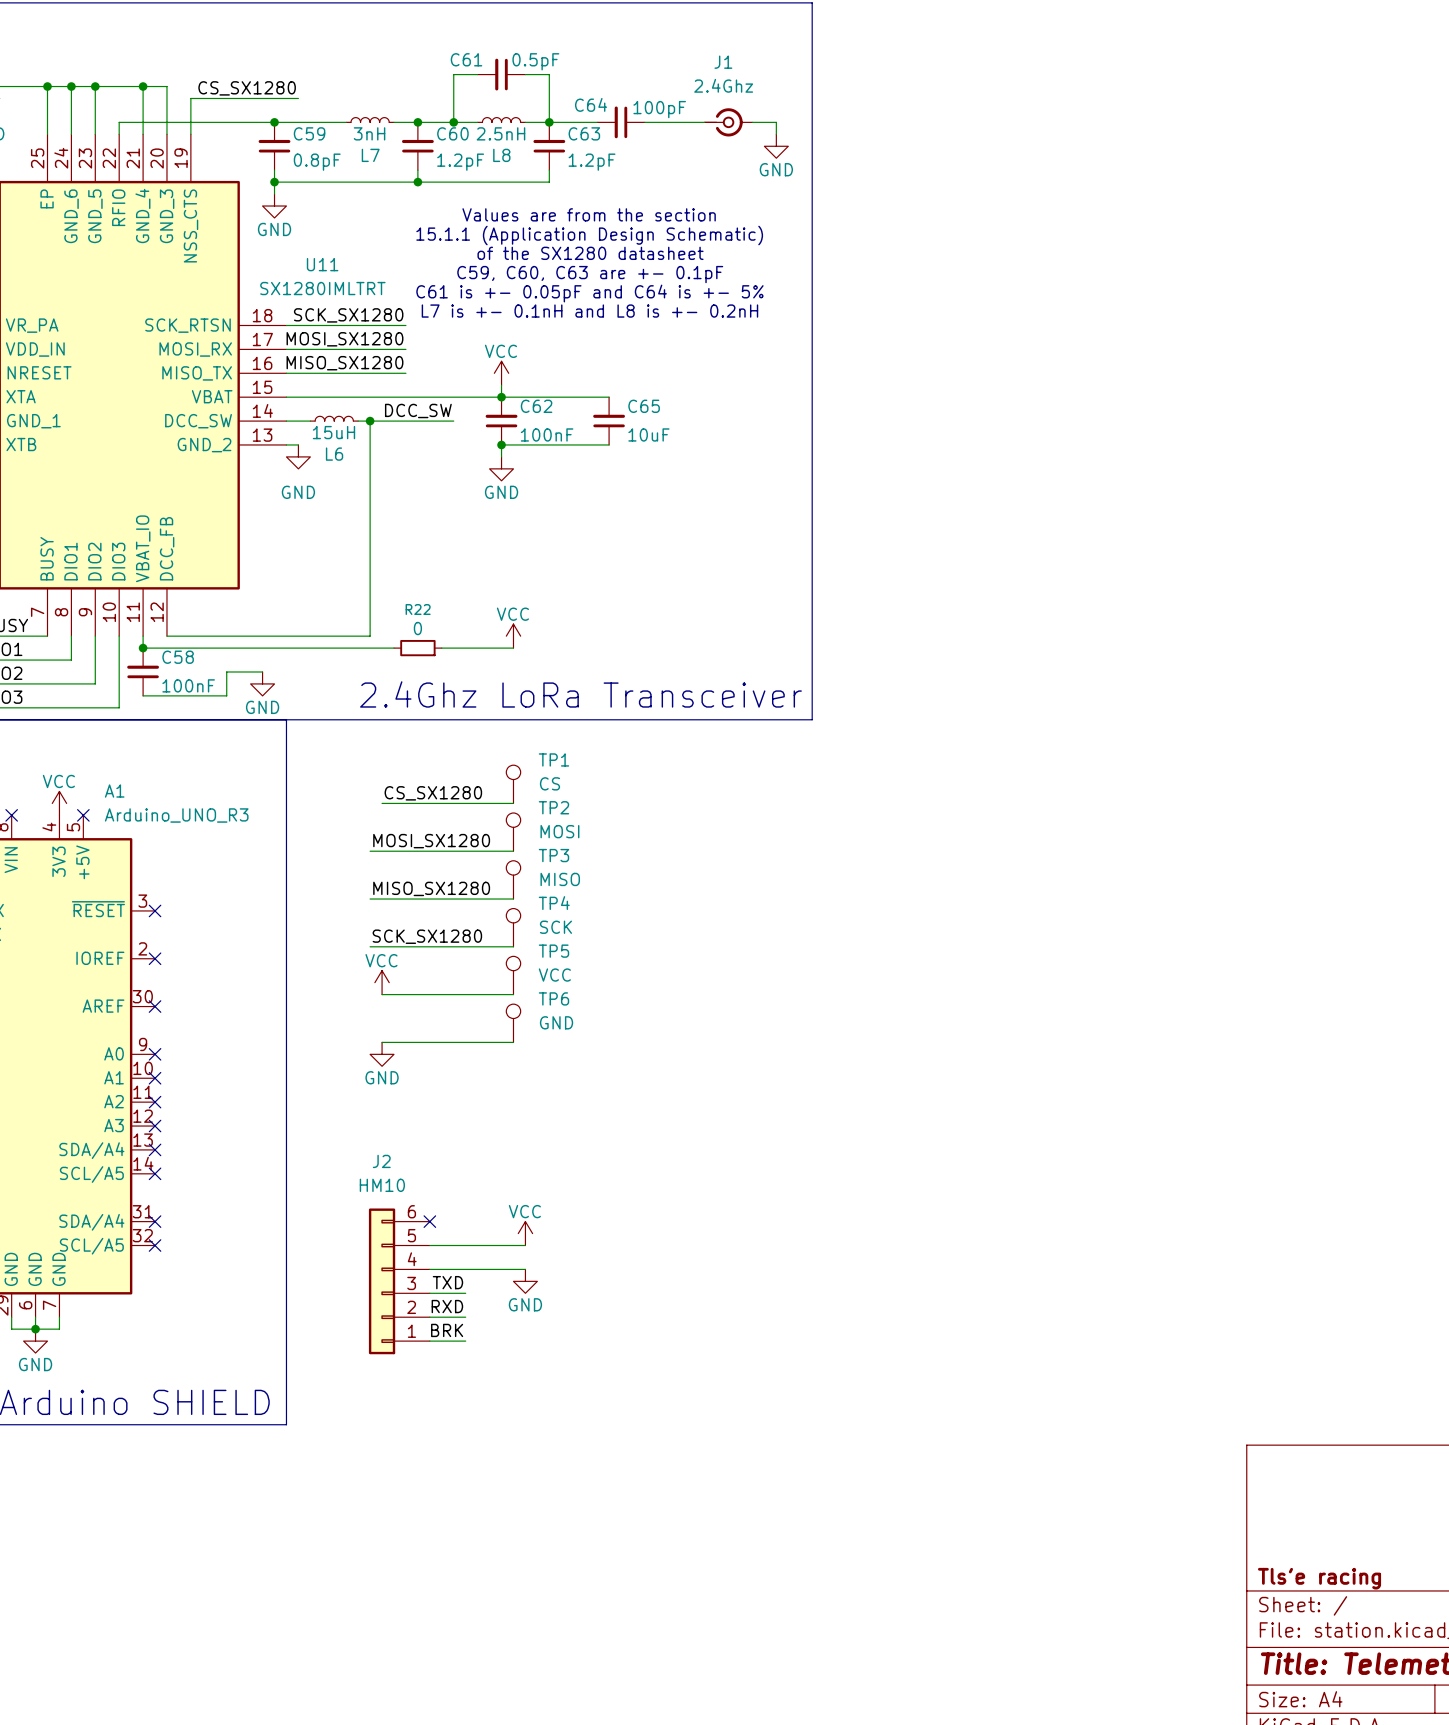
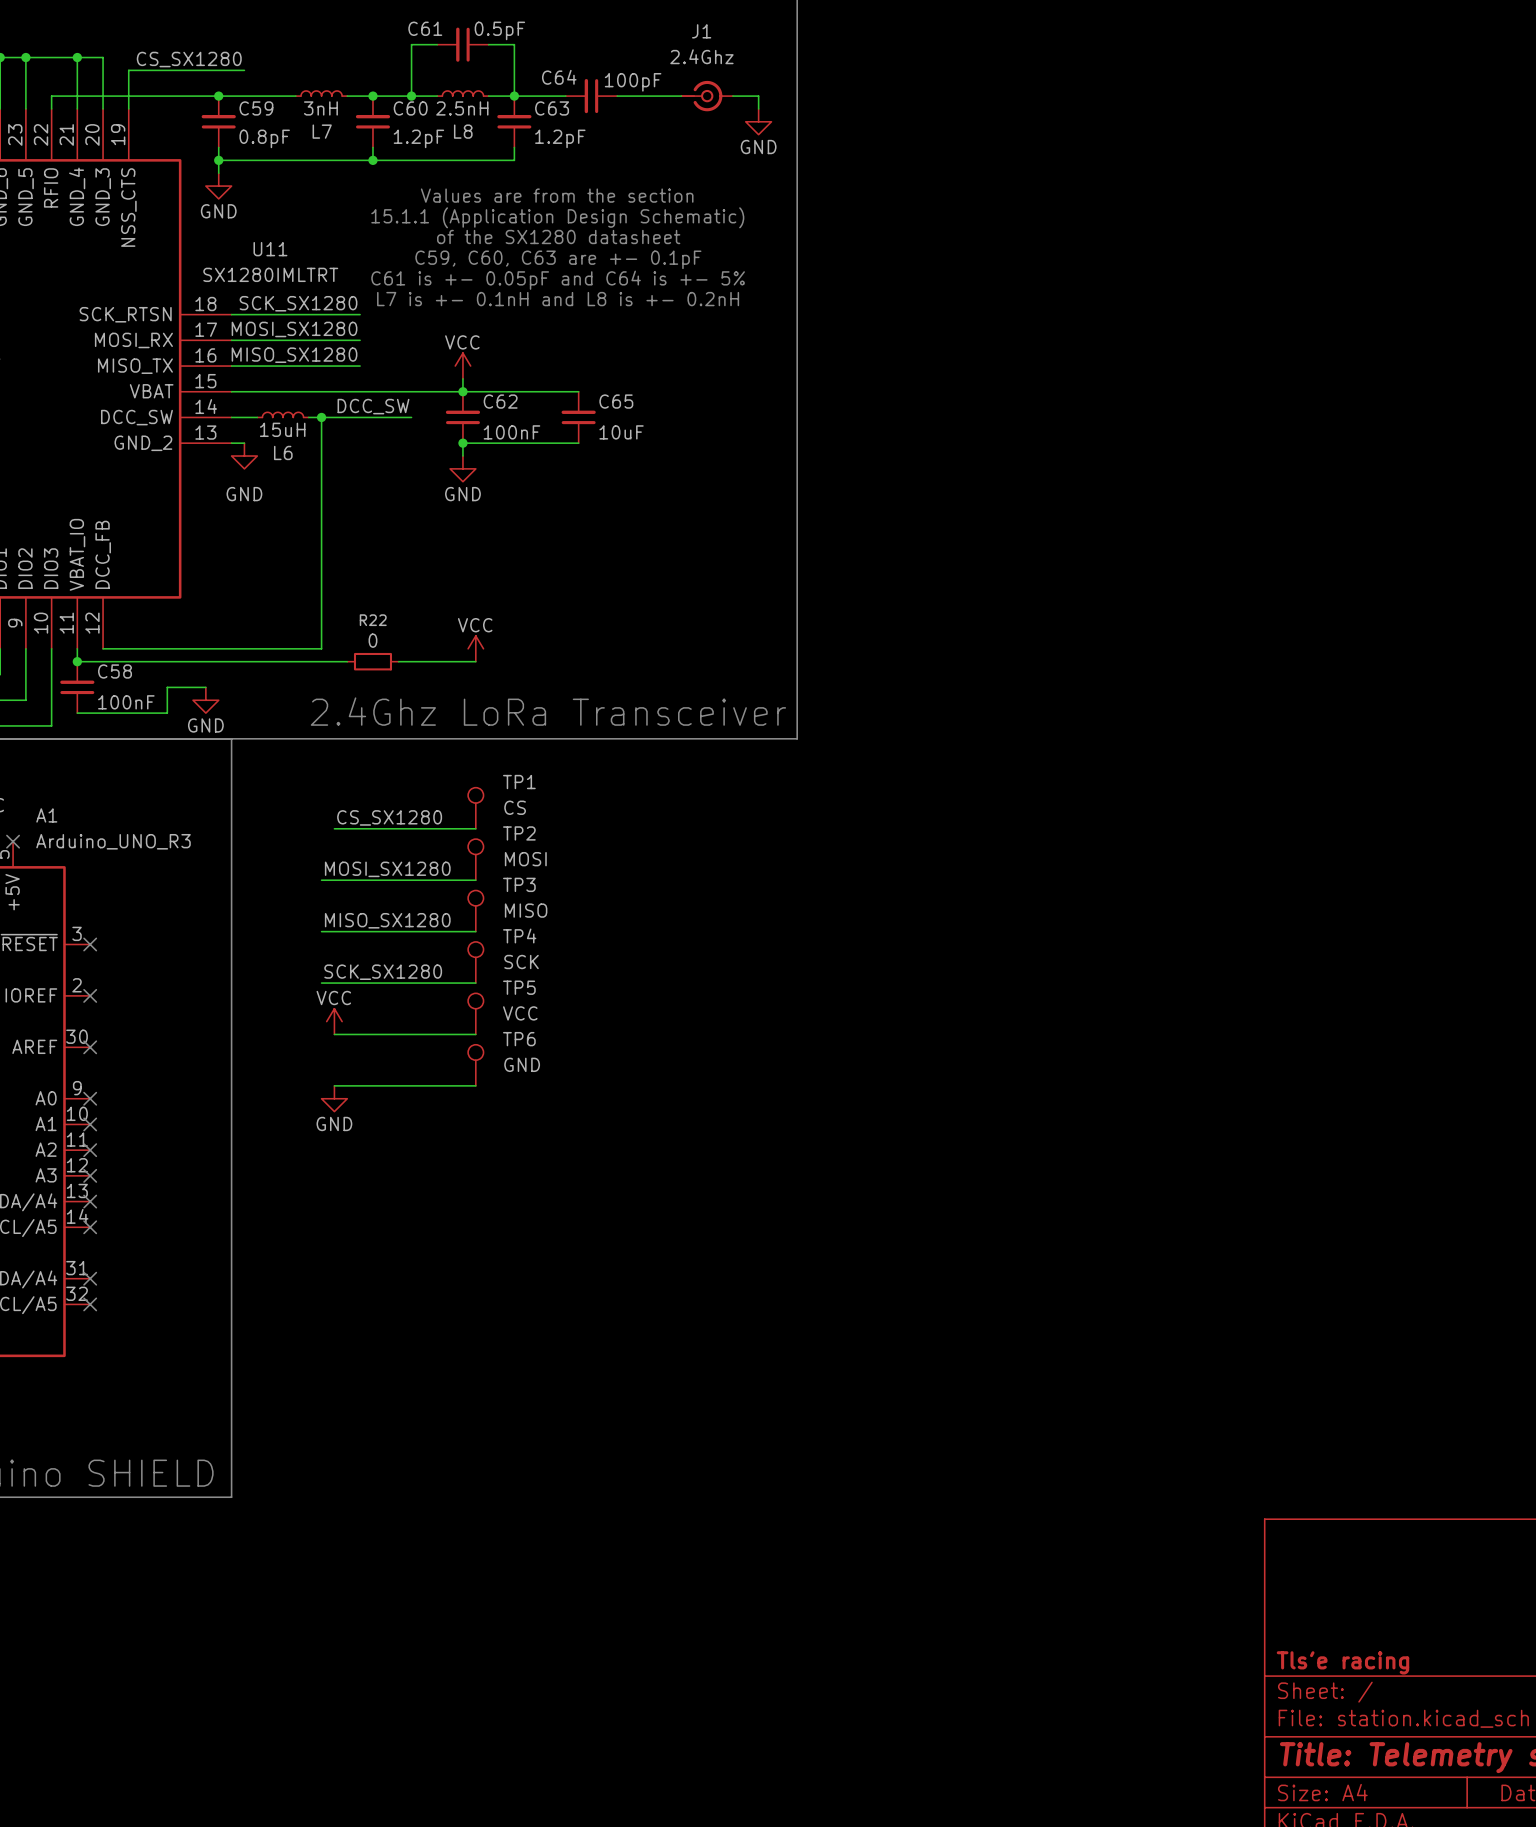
no-connect mark: (429, 1221) -> none
power symbol: VCC (525, 1233) -> none
wire: (429, 1245) (525, 1245) -> none
wire: (429, 1269) (525, 1269) -> none
J2: HM10 (399, 1281) -> none
power symbol: GND (525, 1281) -> none
label: TXD (447, 1282) -> none
wire: (429, 1293) (465, 1293) -> none
label: RXD (447, 1306) -> none
wire: (429, 1317) (465, 1317) -> none
label: BRK (447, 1330) -> none
wire: (429, 1341) (465, 1341) -> none

